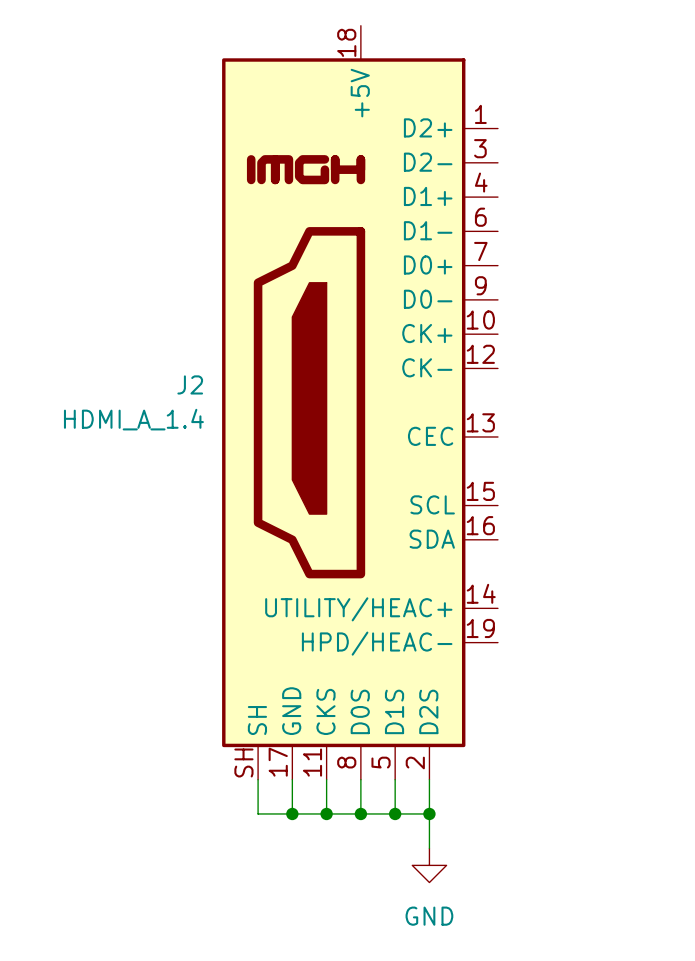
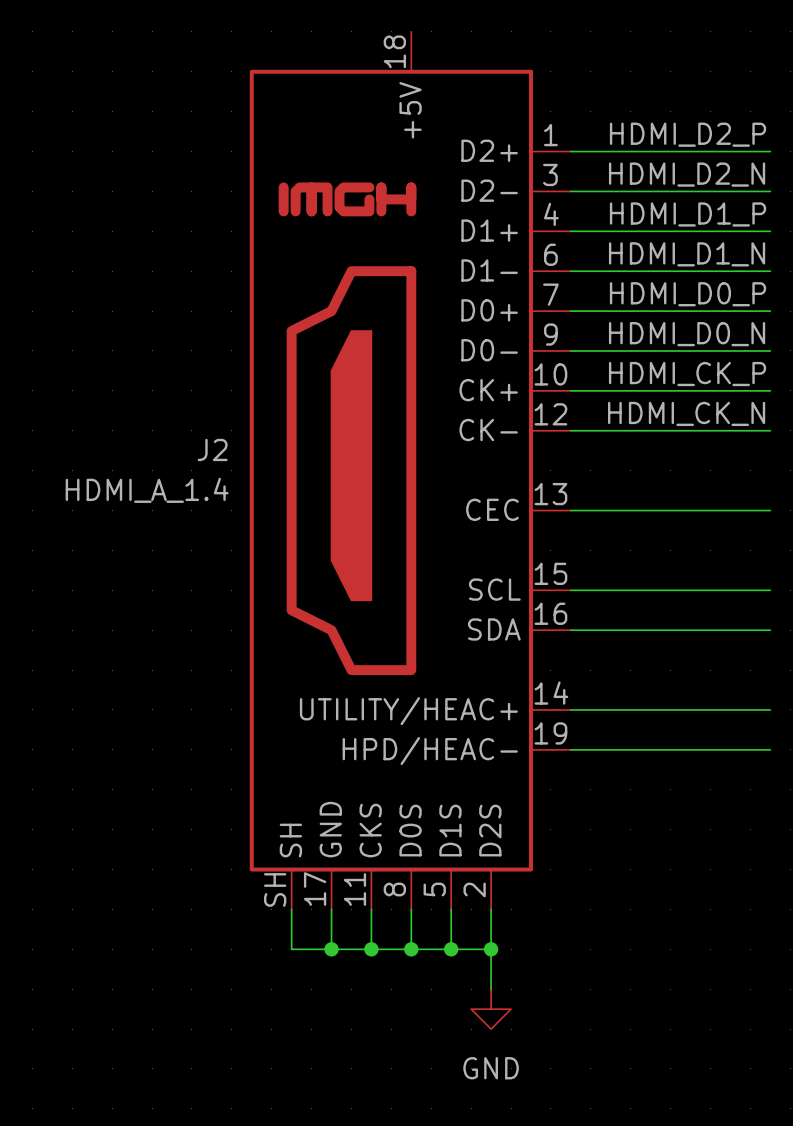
label: none -> HDMI_D2_P (688, 134)
wire: none -> (570, 151) (770, 151)
label: none -> HDMI_D2_N (687, 174)
wire: none -> (570, 191) (770, 191)
label: none -> HDMI_D1_P (688, 214)
wire: none -> (570, 231) (770, 231)
label: none -> HDMI_D1_N (687, 254)
wire: none -> (570, 271) (770, 271)
label: none -> HDMI_D0_P (688, 294)
wire: none -> (570, 311) (770, 311)
label: none -> HDMI_D0_N (687, 334)
wire: none -> (570, 350) (770, 350)
label: none -> HDMI_CK_P (687, 374)
wire: none -> (570, 390) (770, 390)
label: none -> HDMI_CK_N (686, 413)
wire: none -> (570, 430) (770, 430)
wire: none -> (570, 510) (770, 510)
wire: none -> (570, 590) (770, 590)
wire: none -> (570, 630) (770, 630)
wire: none -> (570, 709) (770, 709)
wire: none -> (570, 749) (770, 749)

